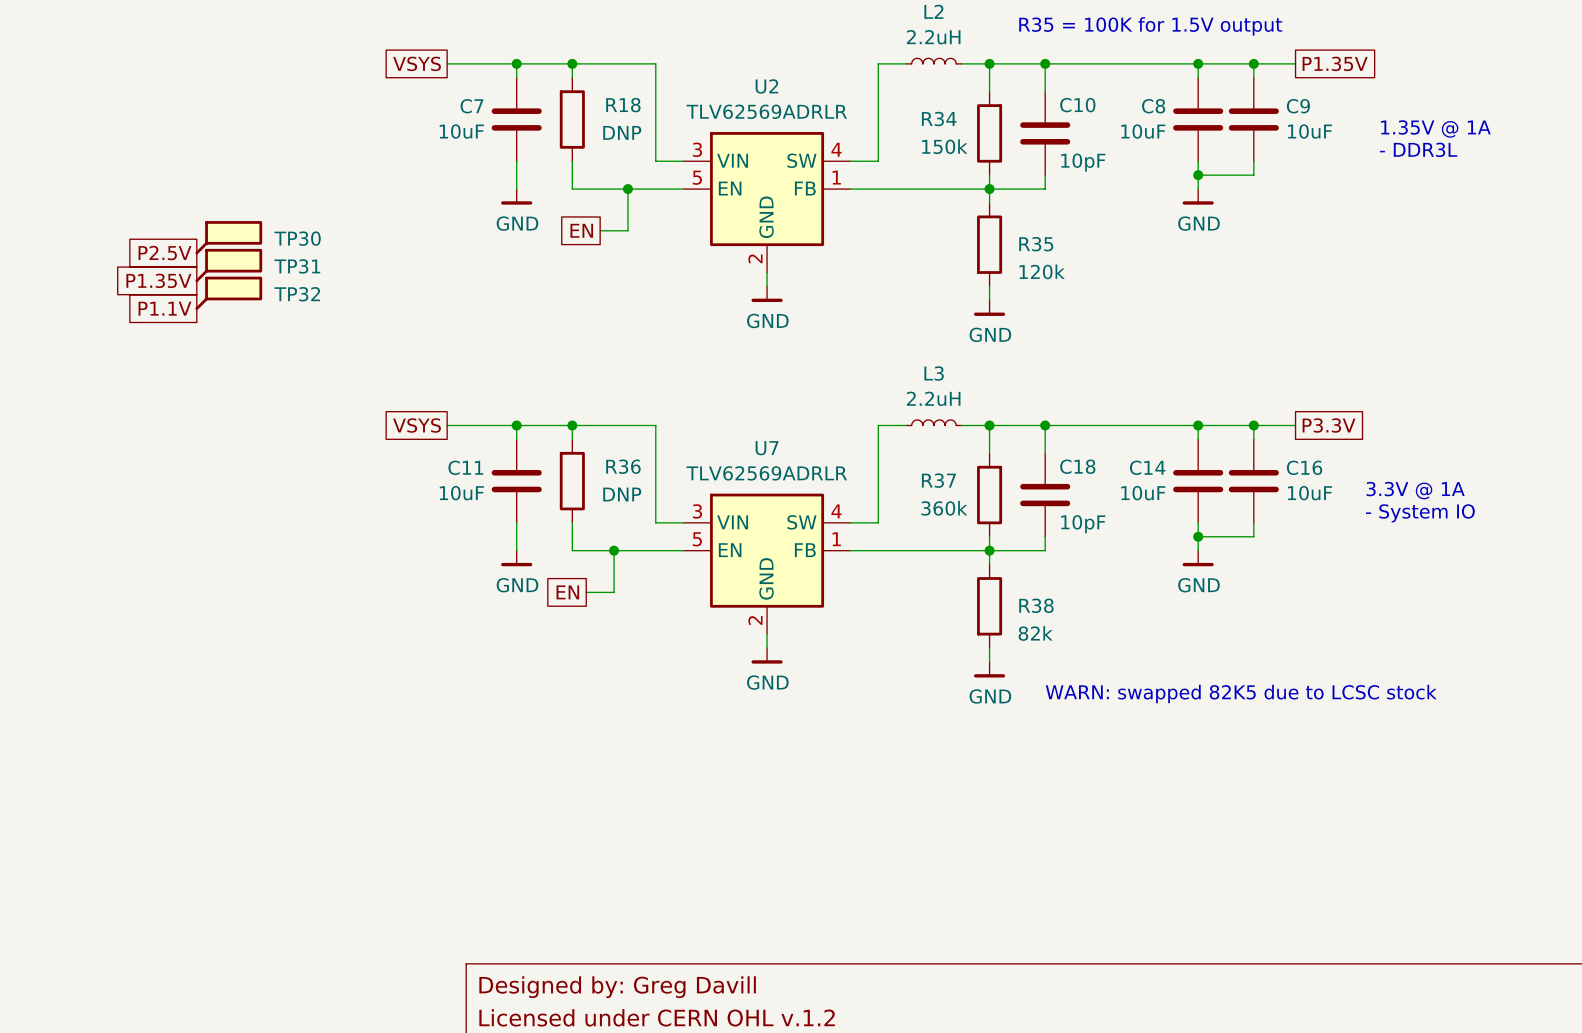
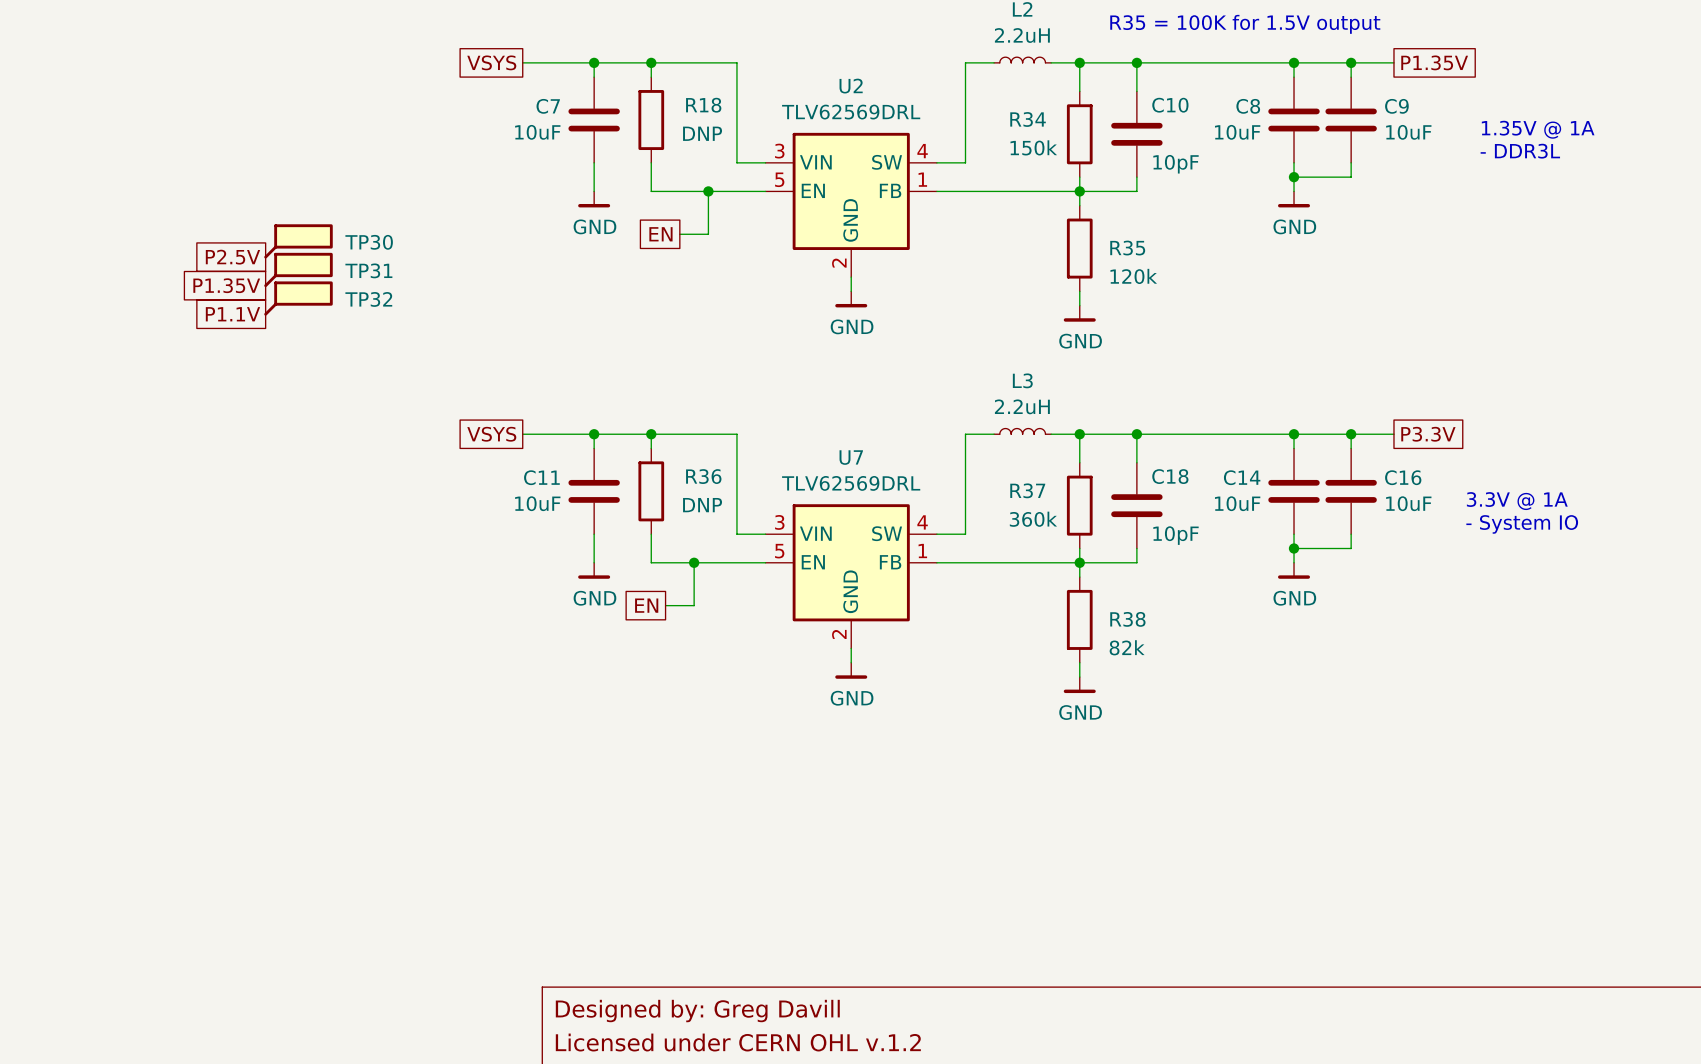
U2 value: TLV62569ADRLR (766, 111) -> TLV62569DRL (851, 112)
U7 value: TLV62569ADRLR (766, 473) -> TLV62569DRL (851, 483)
text: WARN: swapped 82K5 due to LCSC stock (1241, 693) -> none

